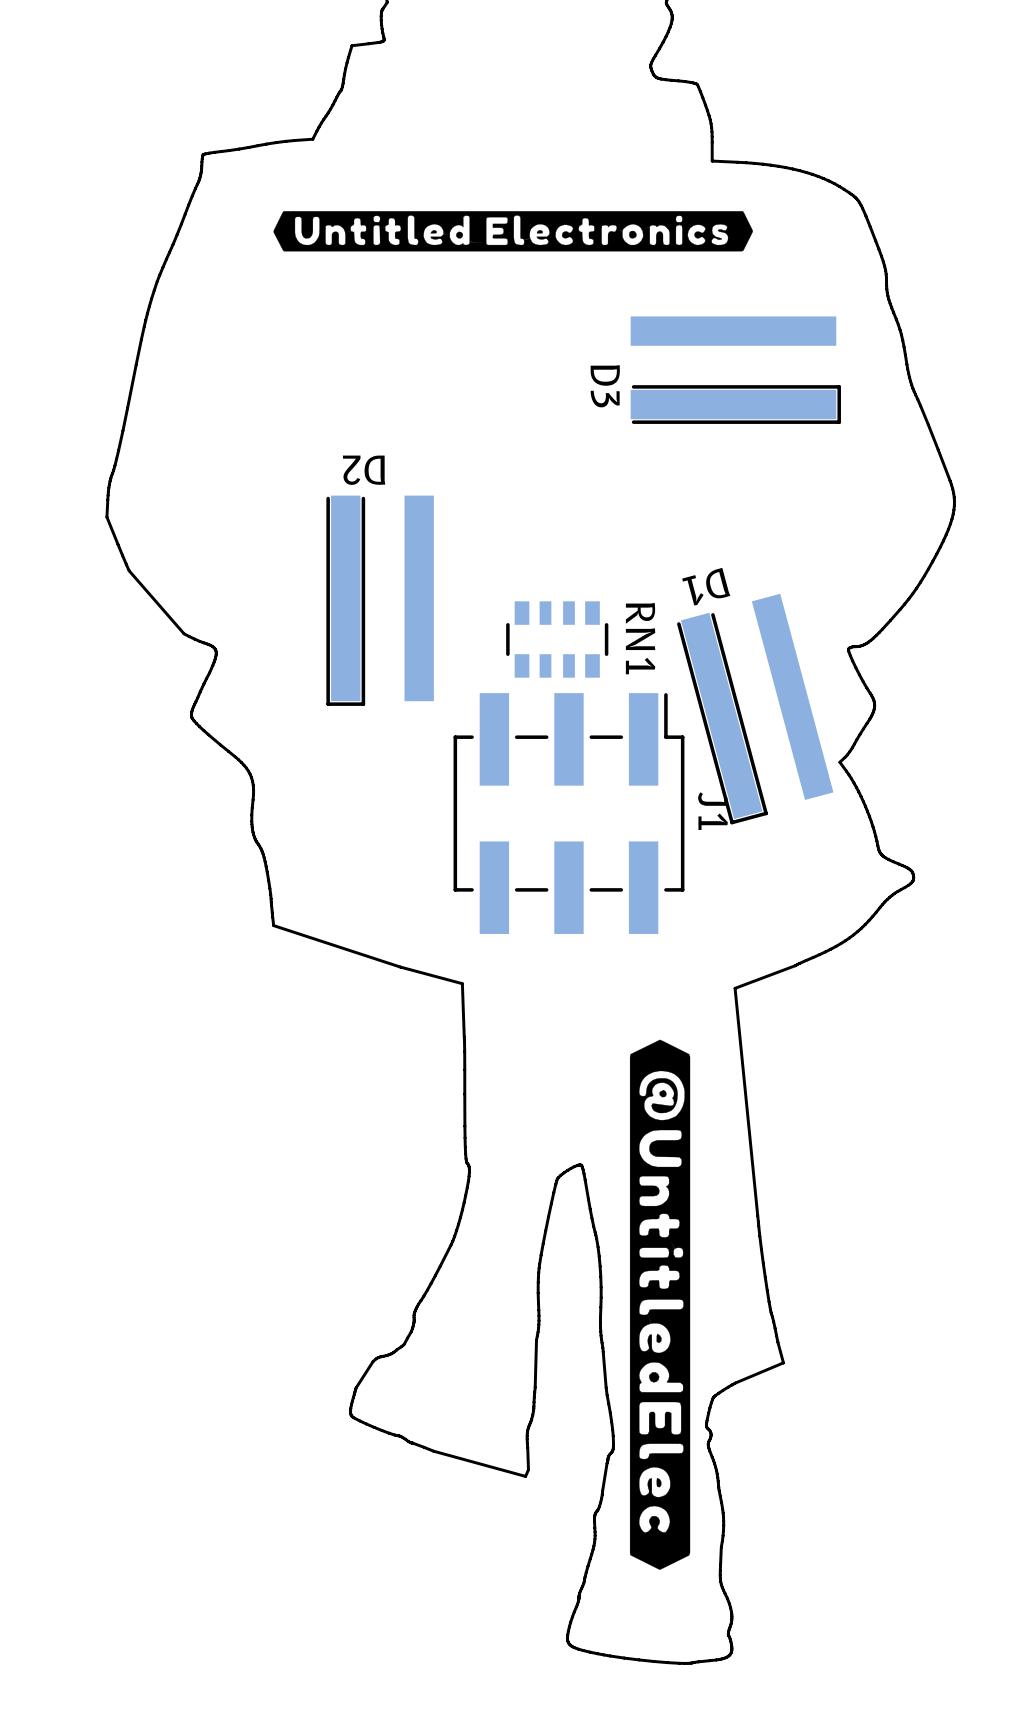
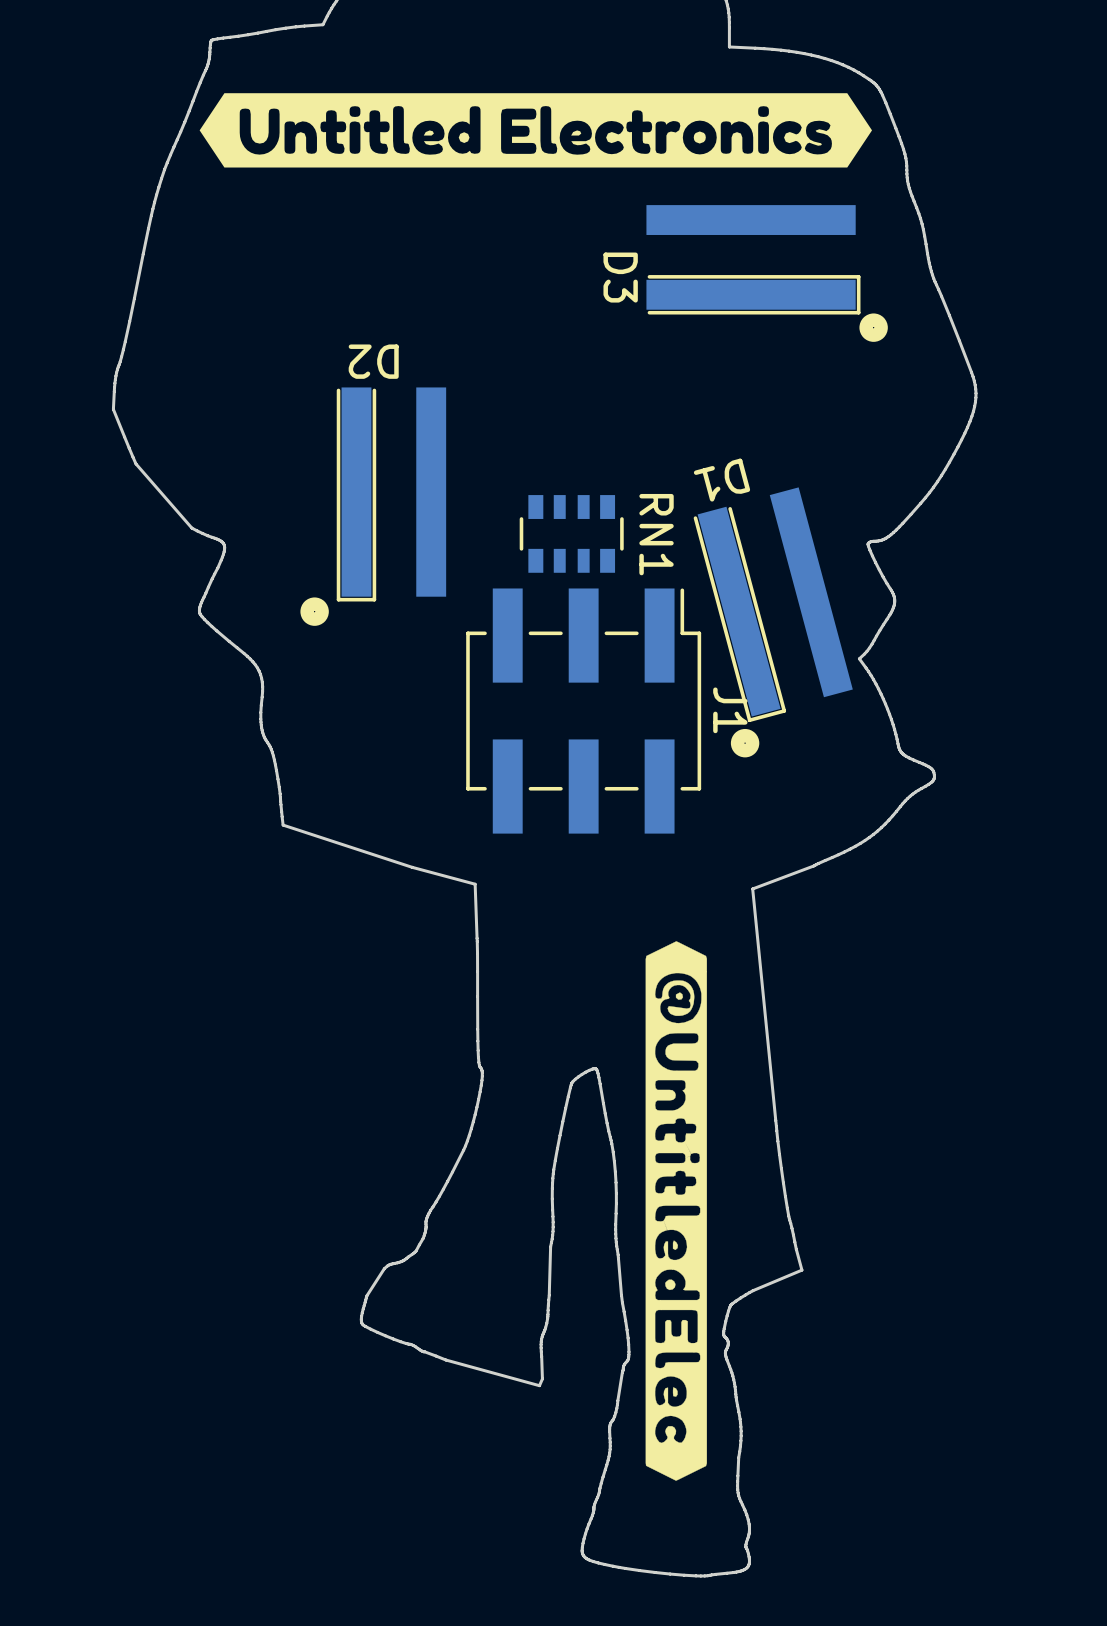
drawing shape: [273, 211, 754, 252] -> [199, 93, 873, 168]
drawing: none -> [859, 313, 888, 342]
drawing: none -> [300, 597, 329, 626]
drawing: none -> [730, 728, 760, 758]

